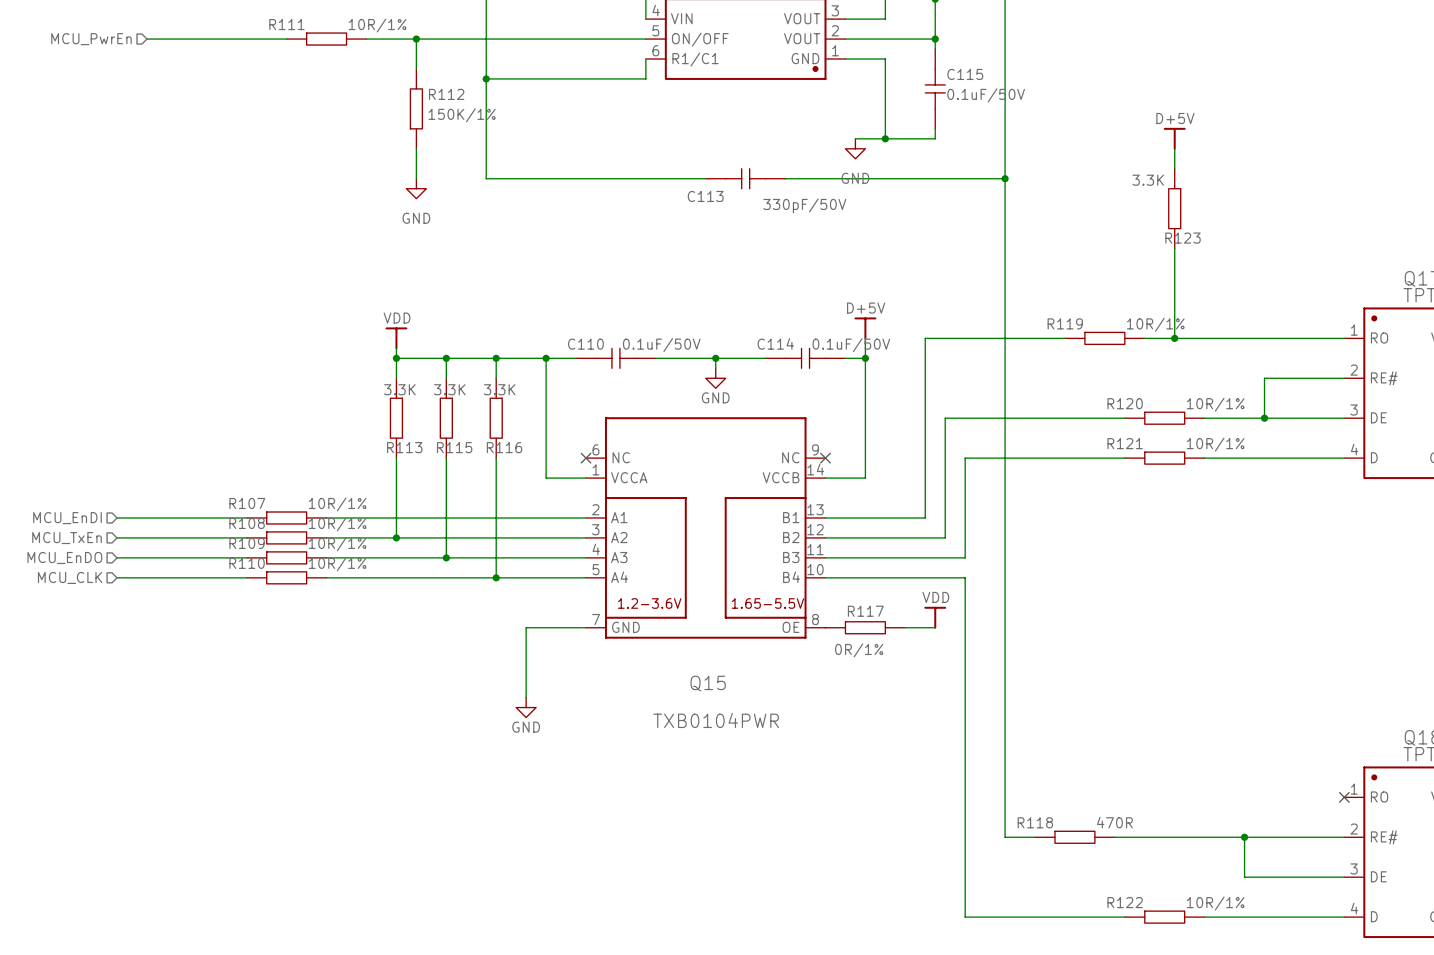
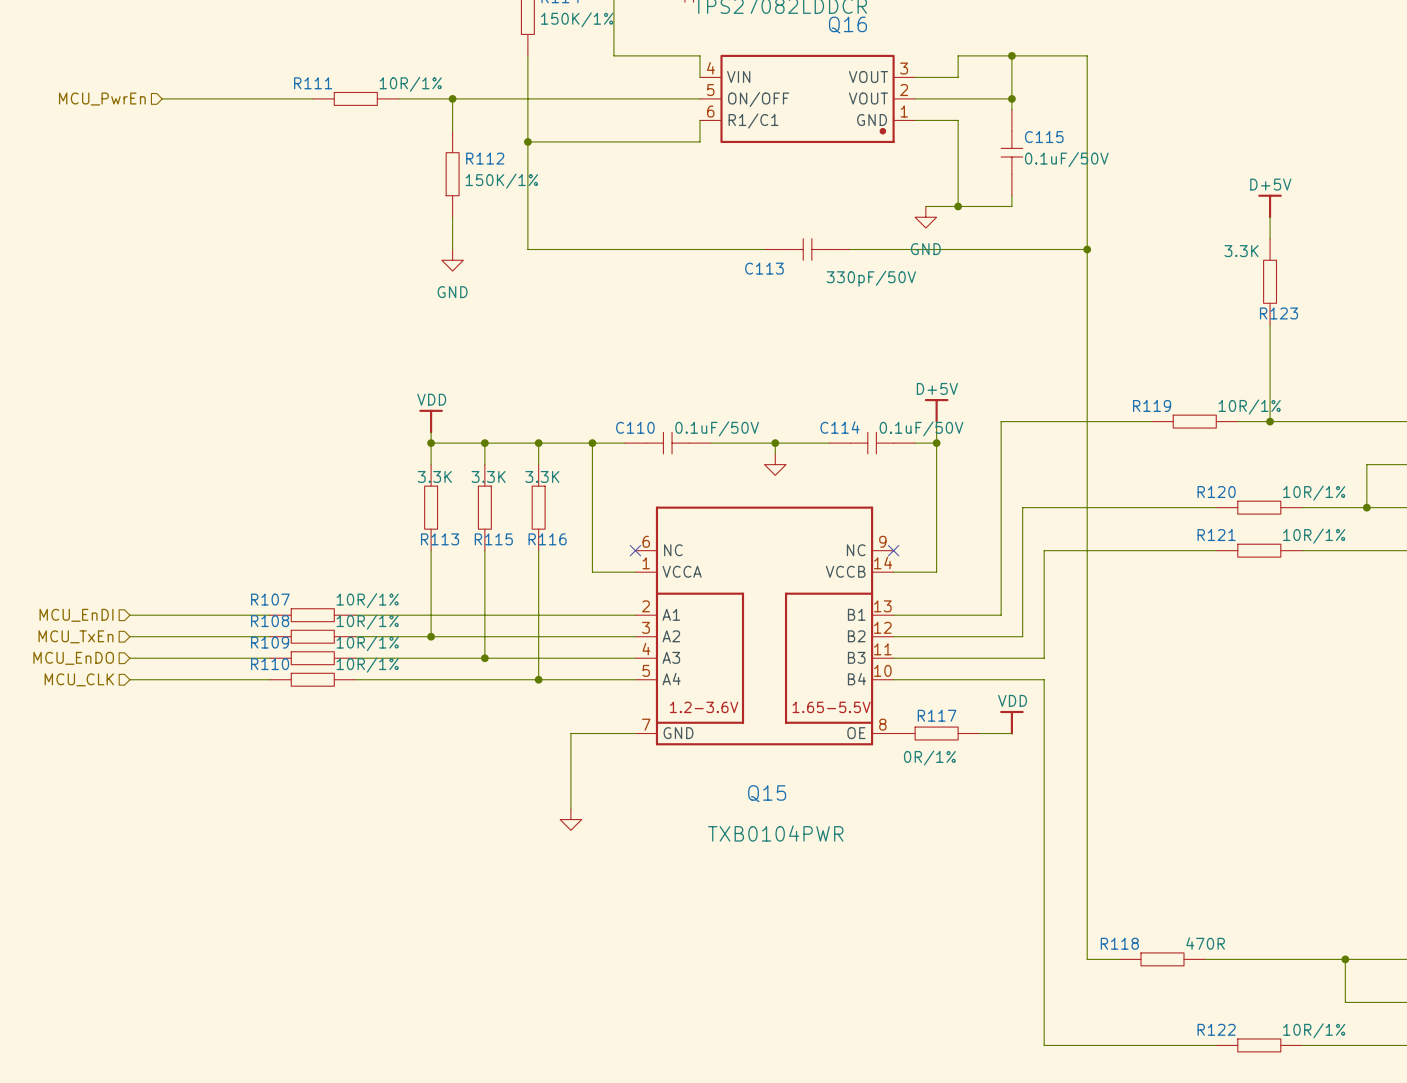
power symbol text: GND (715, 397) -> none
power symbol text: GND (526, 727) -> none

